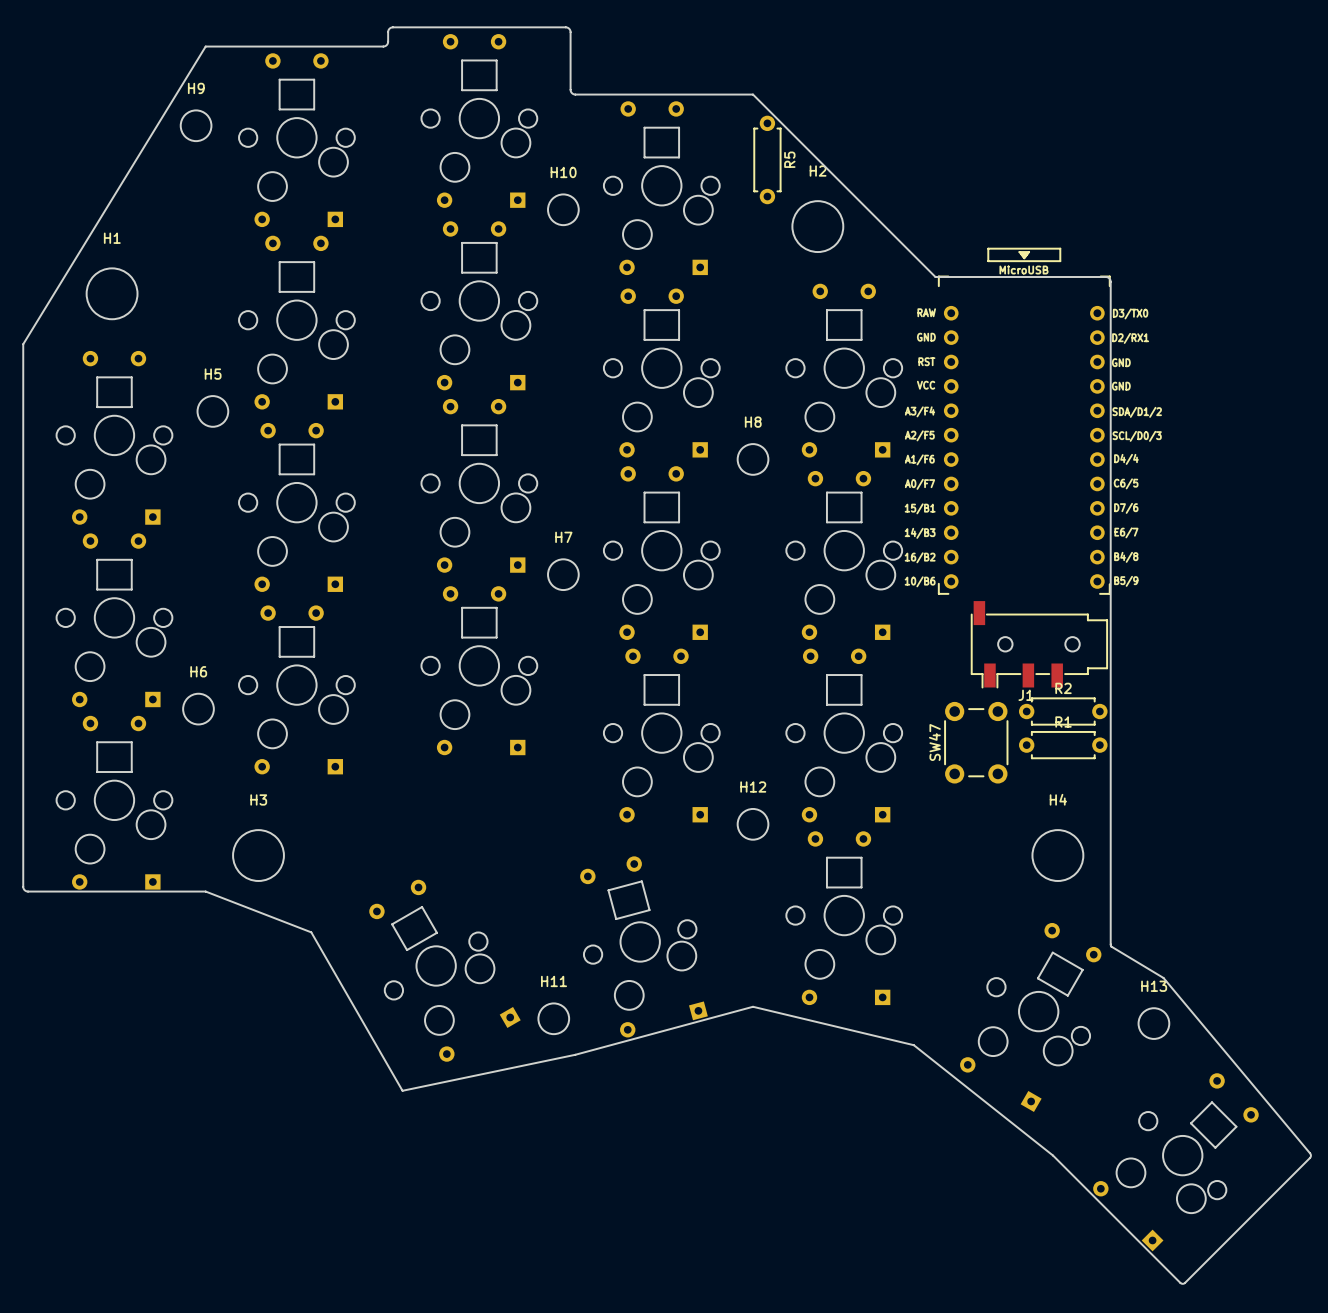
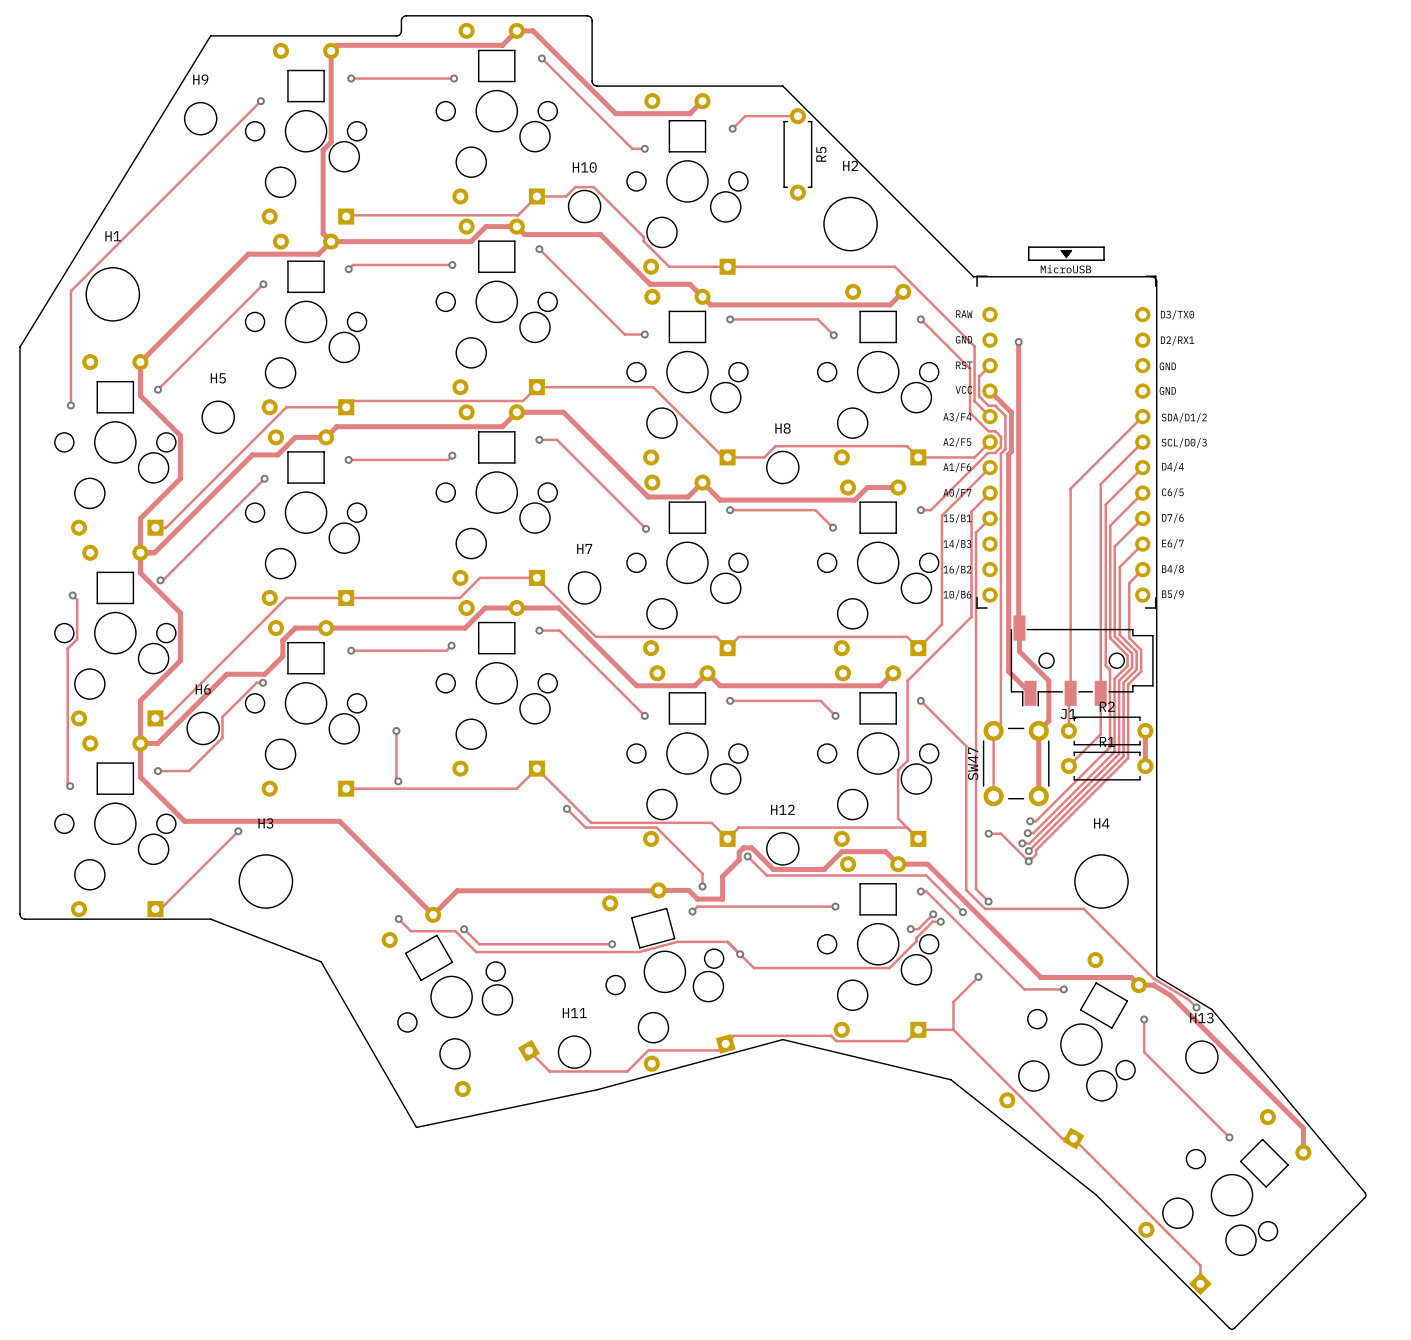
track: none -> (541, 58) (632, 148) (644, 148)
via: none -> (541, 58)
track: none -> (351, 78) (454, 78)
via: none -> (351, 78)
via: none -> (454, 78)
track: none -> (260, 101) (70, 291) (70, 405)
via: none -> (260, 101)
track: none -> (702, 101) (689, 113) (615, 113) (532, 30) (516, 30) (502, 45) (336, 45) (331, 50) (331, 142) (323, 150) (323, 233) (331, 241)
track: none -> (797, 116) (745, 116) (732, 128)
via: none -> (732, 128)
via: none -> (644, 148)
track: none -> (346, 216) (518, 215) (536, 196) (566, 196) (575, 187) (593, 187) (643, 236) (643, 241) (669, 266) (894, 266) (974, 346) (974, 401) (990, 416) (990, 414)
track: none -> (331, 241) (318, 254) (248, 254) (140, 362) (140, 395) (180, 435) (180, 478) (140, 518) (140, 572) (180, 612) (180, 660) (140, 700) (140, 777) (184, 821) (339, 821) (433, 914) (457, 890) (688, 890) (697, 899) (722, 899) (722, 876) (739, 859) (739, 852) (743, 847) (751, 847) (773, 869) (824, 869) (842, 851) (885, 851) (898, 864) (927, 864) (1040, 977) (1131, 977) (1138, 985) (1153, 985) (1170, 995) (1303, 1128) (1303, 1152)
track: none -> (331, 241) (470, 241) (486, 226) (516, 226) (524, 234) (600, 234) (650, 284) (689, 284) (710, 304) (890, 304) (903, 291)
track: none -> (539, 249) (624, 334) (644, 334)
via: none -> (539, 249)
track: none -> (452, 264) (352, 264) (348, 269)
via: none -> (452, 264)
via: none -> (348, 269)
track: none -> (263, 284) (158, 389)
via: none -> (263, 284)
track: none -> (730, 319) (817, 319) (833, 335)
via: none -> (730, 319)
track: none -> (920, 319) (970, 368) (970, 412) (988, 431) (995, 431) (1000, 436) (1000, 447) (995, 453) (987, 453) (930, 510) (920, 510)
via: none -> (920, 319)
via: none -> (644, 334)
via: none -> (833, 335)
track: none -> (1018, 342) (1018, 627)
via: none -> (1018, 342)
track: none -> (990, 365) (979, 376) (979, 396) (988, 405) (995, 405) (1005, 415) (1005, 449) (1000, 453) (1000, 723) (993, 730) (993, 796)
via: none -> (158, 389)
track: none -> (990, 391) (1011, 412) (1011, 451) (1008, 454) (1008, 671) (1030, 693)
via: none -> (70, 405)
track: none -> (1142, 416) (1070, 488) (1068, 730)
track: none -> (539, 439) (556, 439) (646, 528)
via: none -> (539, 439)
track: none -> (990, 442) (974, 457) (918, 457) (907, 446) (775, 446) (764, 457) (723, 457) (653, 387) (536, 387) (523, 400) (352, 400) (346, 407) (286, 407) (166, 527) (155, 527)
track: none -> (1142, 442) (1100, 484) (1100, 734) (1068, 766)
track: none -> (452, 455) (448, 459) (348, 459)
via: none -> (452, 455)
via: none -> (348, 459)
track: none -> (990, 467) (941, 515) (941, 624) (918, 648) (907, 636) (738, 636) (727, 648) (716, 636) (595, 636) (536, 577) (480, 577) (459, 597) (286, 597) (166, 718) (155, 718)
track: none -> (1142, 467) (1105, 504) (1105, 665) (1110, 669) (1110, 747) (1035, 821) (1030, 821)
track: none -> (264, 478) (162, 580) (160, 580)
via: none -> (264, 478)
track: none -> (898, 487) (867, 487) (854, 500) (720, 500) (702, 482) (688, 496) (648, 496) (563, 412) (516, 412) (502, 426) (336, 426) (326, 437) (295, 437) (277, 454) (252, 454) (154, 552) (140, 552)
track: none -> (990, 493) (971, 511) (971, 616) (907, 680) (907, 760) (898, 770) (898, 818) (918, 838)
track: none -> (1142, 493) (1110, 525) (1110, 638) (1127, 655) (1127, 665) (1114, 678) (1114, 752) (1033, 833) (1027, 833)
track: none -> (730, 510) (815, 510) (833, 527)
via: none -> (730, 510)
via: none -> (920, 510)
track: none -> (990, 518) (976, 532) (976, 889) (988, 901)
track: none -> (1142, 518) (1114, 546) (1114, 636) (1132, 653) (1132, 667) (1119, 680) (1119, 754) (1029, 843) (1022, 843)
via: none -> (833, 527)
via: none -> (646, 528)
track: none -> (1142, 544) (1119, 567) (1119, 634) (1136, 651) (1136, 669) (1123, 682) (1123, 756) (1028, 851)
track: none -> (1142, 569) (1129, 583) (1129, 637) (1141, 649) (1141, 671) (1128, 684) (1128, 758) (1036, 850) (1036, 854) (1032, 858) (1028, 858) (1028, 861) (1001, 833) (988, 833)
via: none -> (160, 580)
track: none -> (72, 595) (77, 599) (77, 639) (67, 648) (67, 783) (70, 786)
via: none -> (72, 595)
track: none -> (1016, 624) (1019, 628) (1019, 651) (1048, 680) (1048, 720) (1038, 730)
track: none -> (539, 630) (559, 630) (644, 715)
via: none -> (539, 630)
track: none -> (451, 645) (446, 650) (351, 650)
via: none -> (451, 645)
via: none -> (351, 650)
track: none -> (893, 673) (880, 685) (720, 685) (707, 673) (694, 685) (636, 685) (558, 608) (485, 608) (465, 628) (295, 628) (282, 640) (282, 656) (264, 674) (226, 674) (157, 743) (140, 743)
track: none -> (262, 682) (256, 682) (222, 716) (222, 737) (189, 771) (158, 771)
via: none -> (262, 682)
track: none -> (730, 700) (820, 700) (835, 715)
via: none -> (730, 700)
track: none -> (920, 700) (966, 746) (966, 890) (985, 908) (1083, 908) (1153, 978) (1188, 999) (1196, 1007)
via: none -> (920, 700)
via: none -> (644, 715)
via: none -> (835, 715)
track: none -> (1038, 728) (1038, 796)
track: none -> (396, 730) (396, 779) (398, 781)
via: none -> (396, 730)
track: none -> (1145, 730) (1145, 766)
via: none -> (158, 771)
via: none -> (398, 781)
via: none -> (70, 786)
track: none -> (346, 788) (516, 788) (536, 768) (591, 822) (711, 822) (727, 838) (738, 827) (907, 827)
track: none -> (566, 808) (585, 827) (656, 827) (702, 873) (702, 886)
via: none -> (566, 808)
via: none -> (1030, 821)
track: none -> (238, 831) (160, 909) (155, 909)
via: none -> (238, 831)
via: none -> (988, 833)
via: none -> (1027, 833)
via: none -> (1022, 843)
via: none -> (1028, 851)
track: none -> (747, 856) (766, 875) (926, 875) (962, 912)
via: none -> (747, 856)
via: none -> (1028, 861)
via: none -> (702, 886)
track: none -> (920, 891) (926, 891) (1024, 989) (1063, 989)
via: none -> (920, 891)
via: none -> (988, 901)
track: none -> (835, 906) (697, 906) (692, 911)
via: none -> (835, 906)
via: none -> (692, 911)
via: none -> (962, 912)
track: none -> (933, 914) (918, 929) (910, 929)
via: none -> (933, 914)
track: none -> (398, 918) (410, 931) (455, 931) (476, 952) (639, 952) (677, 941) (727, 941) (753, 968) (889, 968) (932, 921) (940, 921)
via: none -> (398, 918)
via: none -> (940, 921)
track: none -> (464, 929) (479, 944) (612, 944)
via: none -> (464, 929)
via: none -> (910, 929)
via: none -> (612, 944)
via: none -> (740, 954)
track: none -> (978, 976) (953, 1001) (953, 1029)
via: none -> (978, 976)
via: none -> (1063, 989)
via: none -> (1196, 1007)
track: none -> (1144, 1019) (1144, 1052) (1229, 1137)
via: none -> (1144, 1019)
track: none -> (953, 1029) (918, 1029) (907, 1041) (836, 1041) (831, 1035) (733, 1035) (719, 1050) (648, 1050) (627, 1071) (549, 1071) (529, 1050)
track: none -> (953, 1029) (1062, 1138) (1073, 1138) (1200, 1265) (1200, 1283)
via: none -> (1229, 1137)

